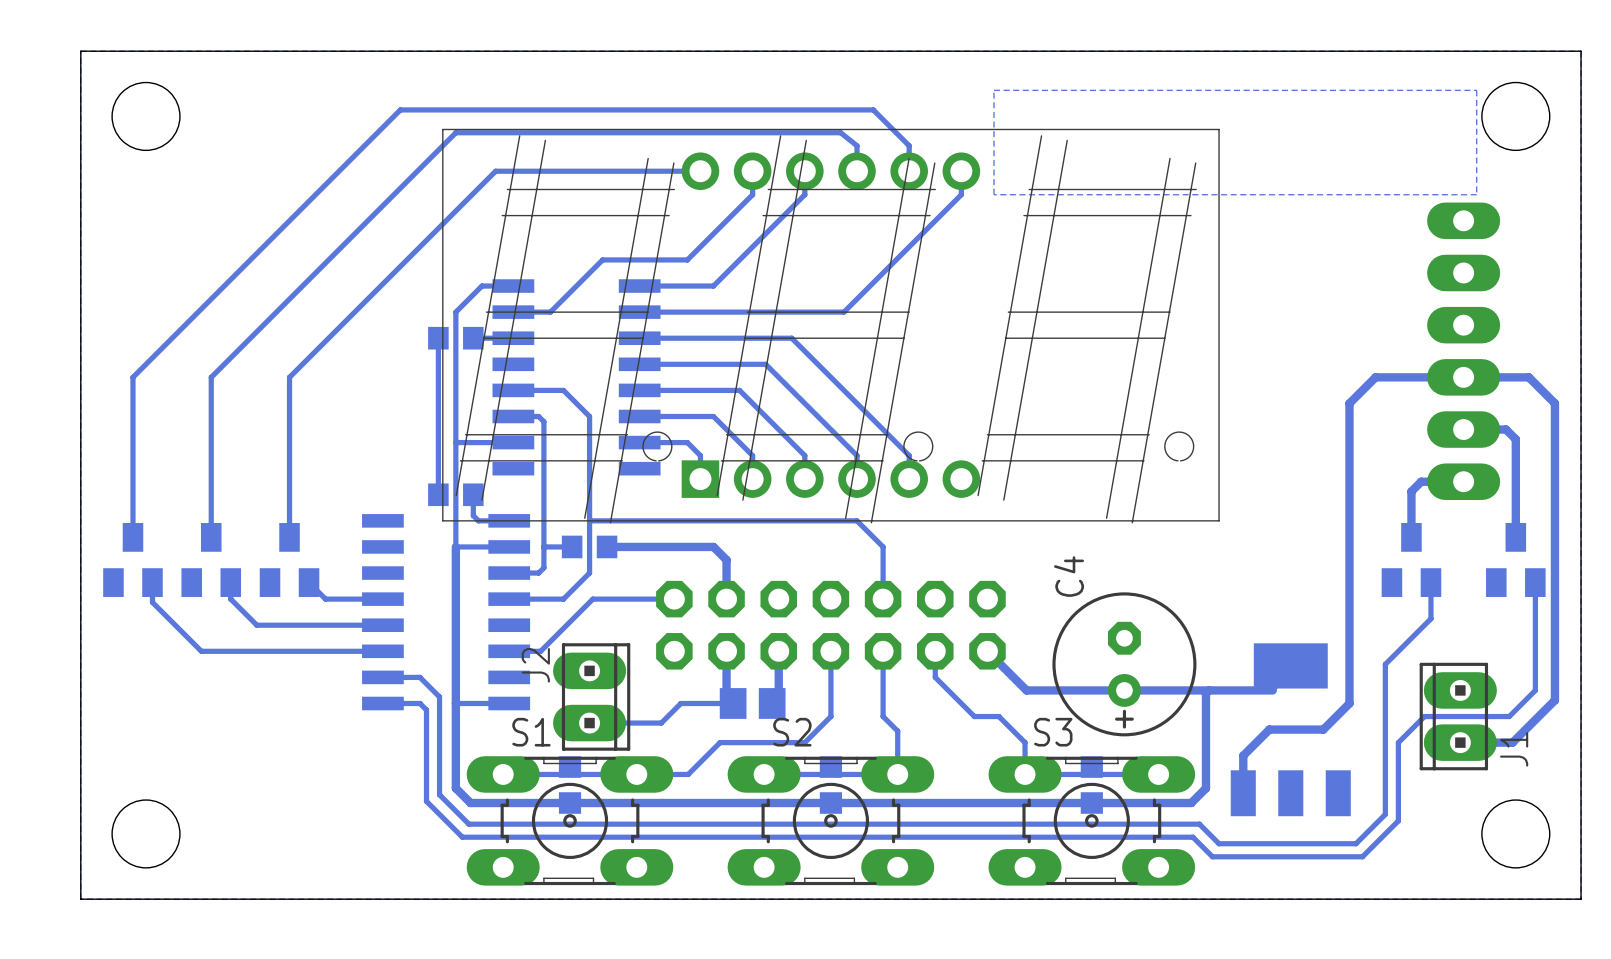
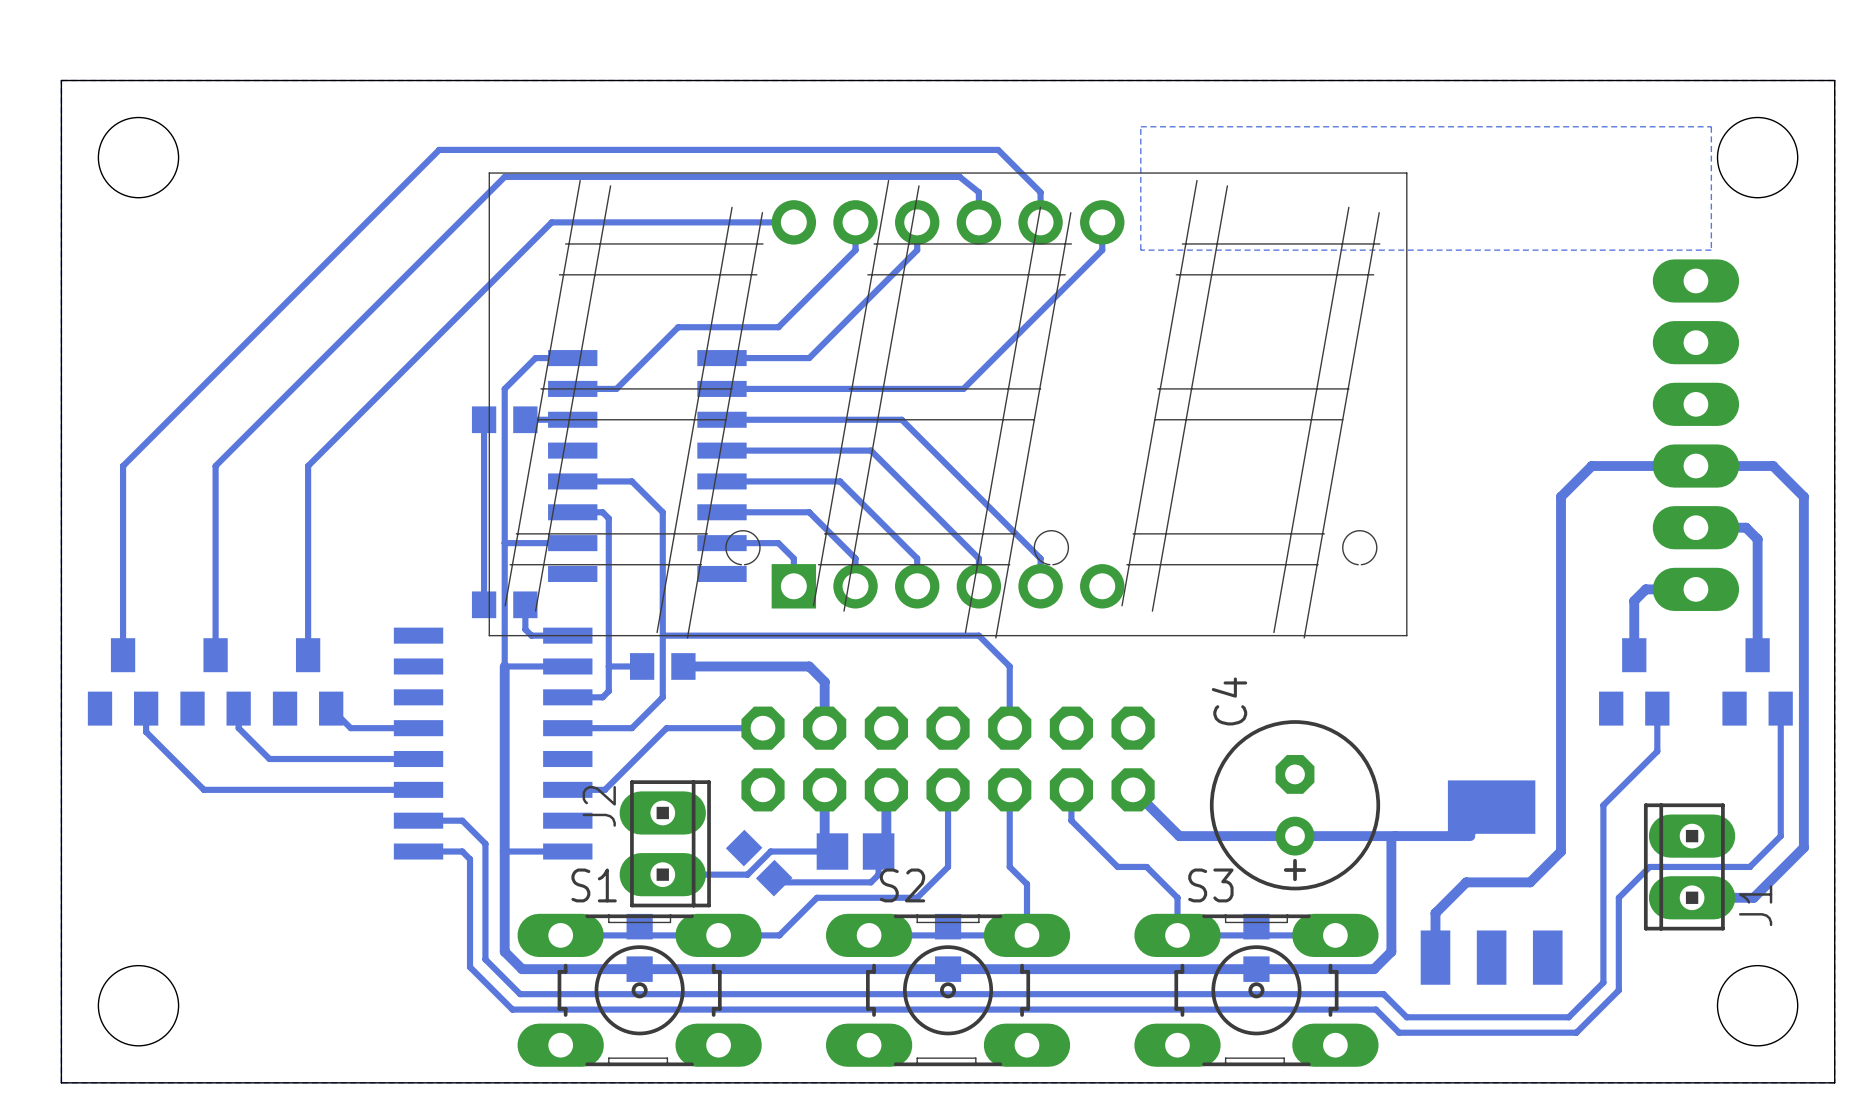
bottom track: none -> (878, 851) (878, 874) (870, 882) (778, 882) (774, 878)
part: none -> (759, 863)

